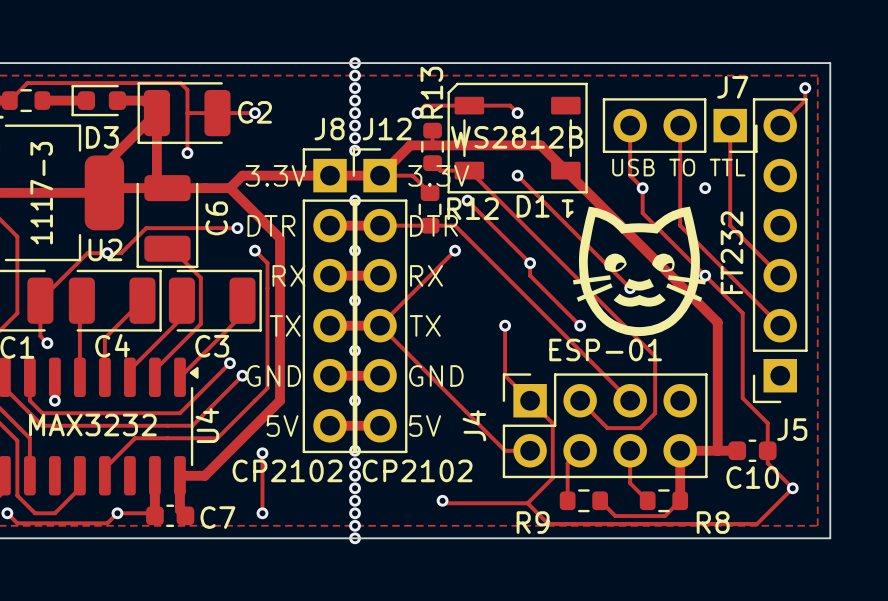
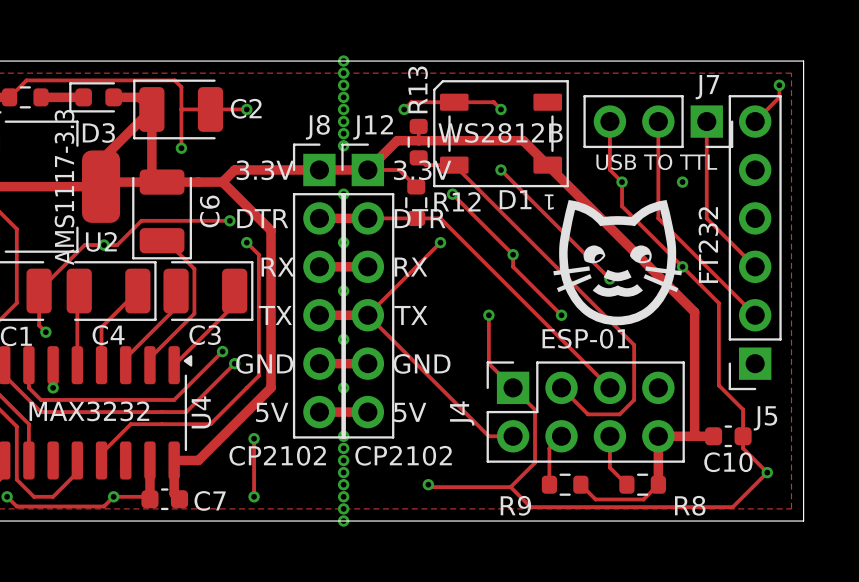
U2 value: 1117-3 (41, 193) -> AMS1117-3.3 (64, 187)

